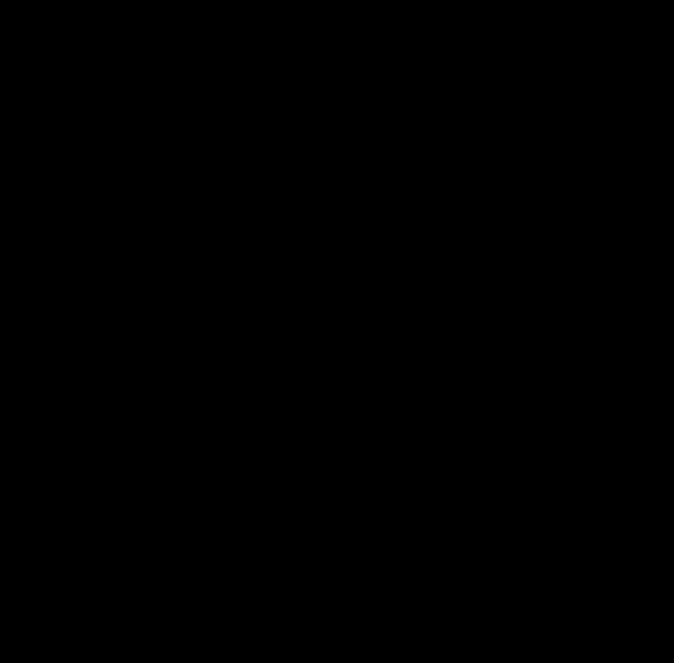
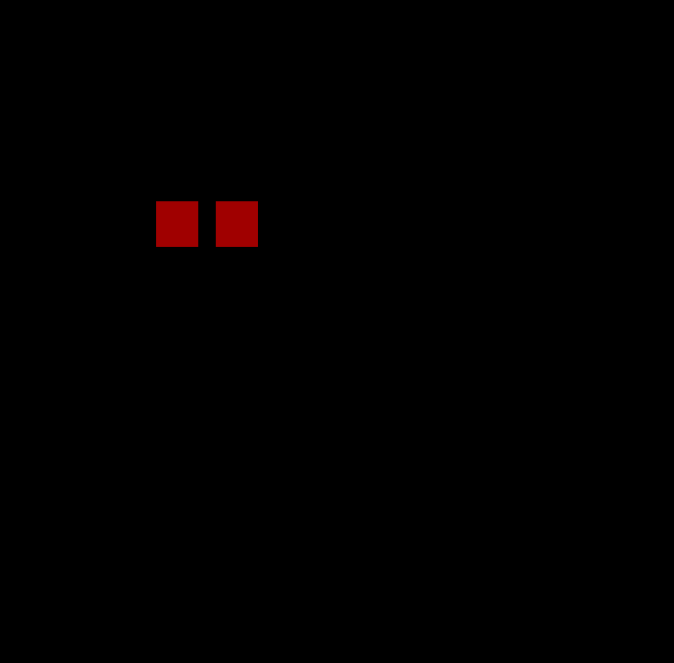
part: none -> (207, 224)

